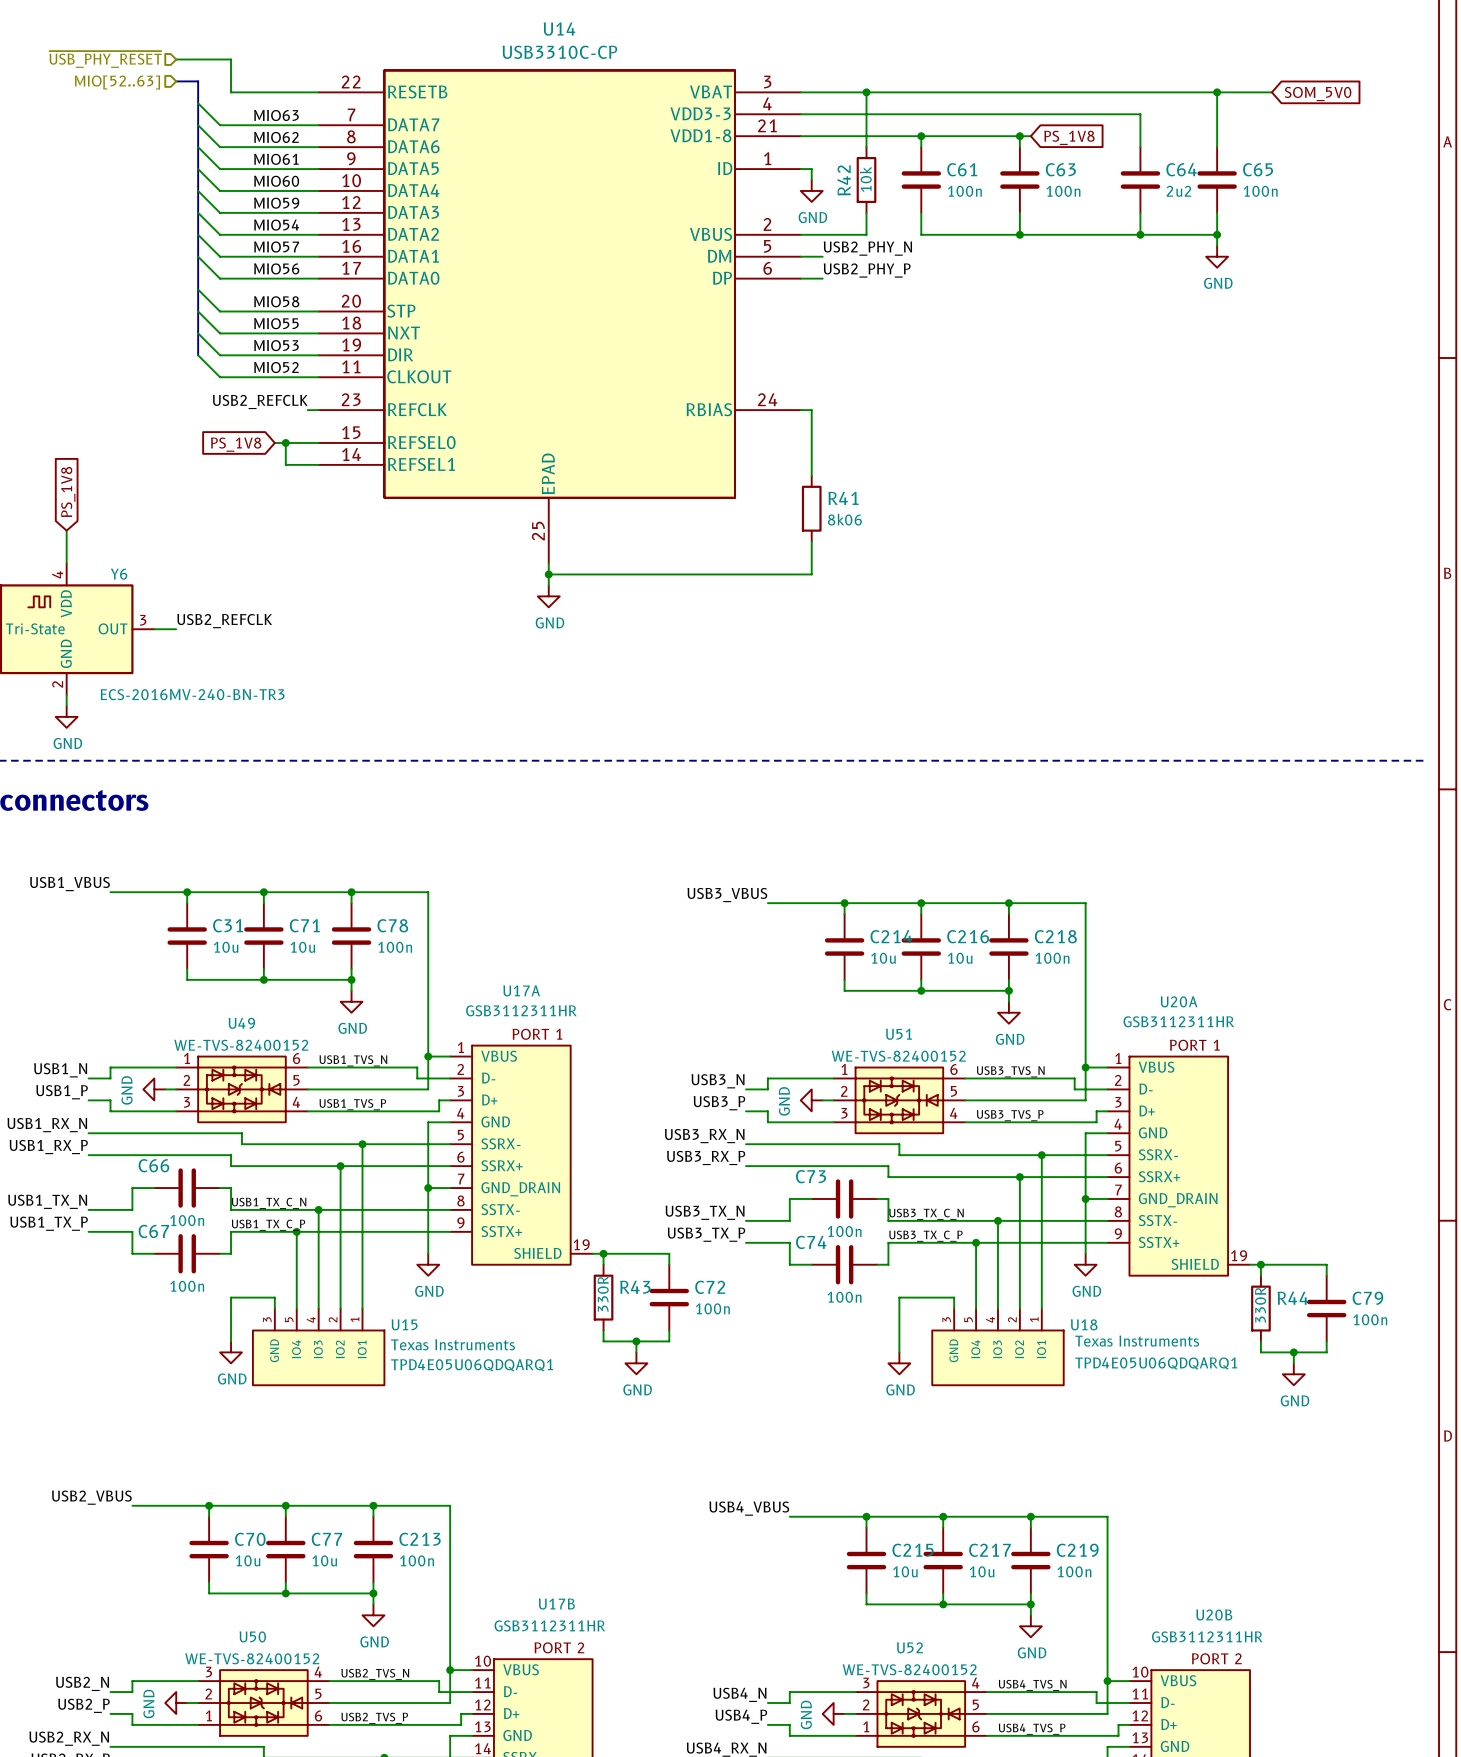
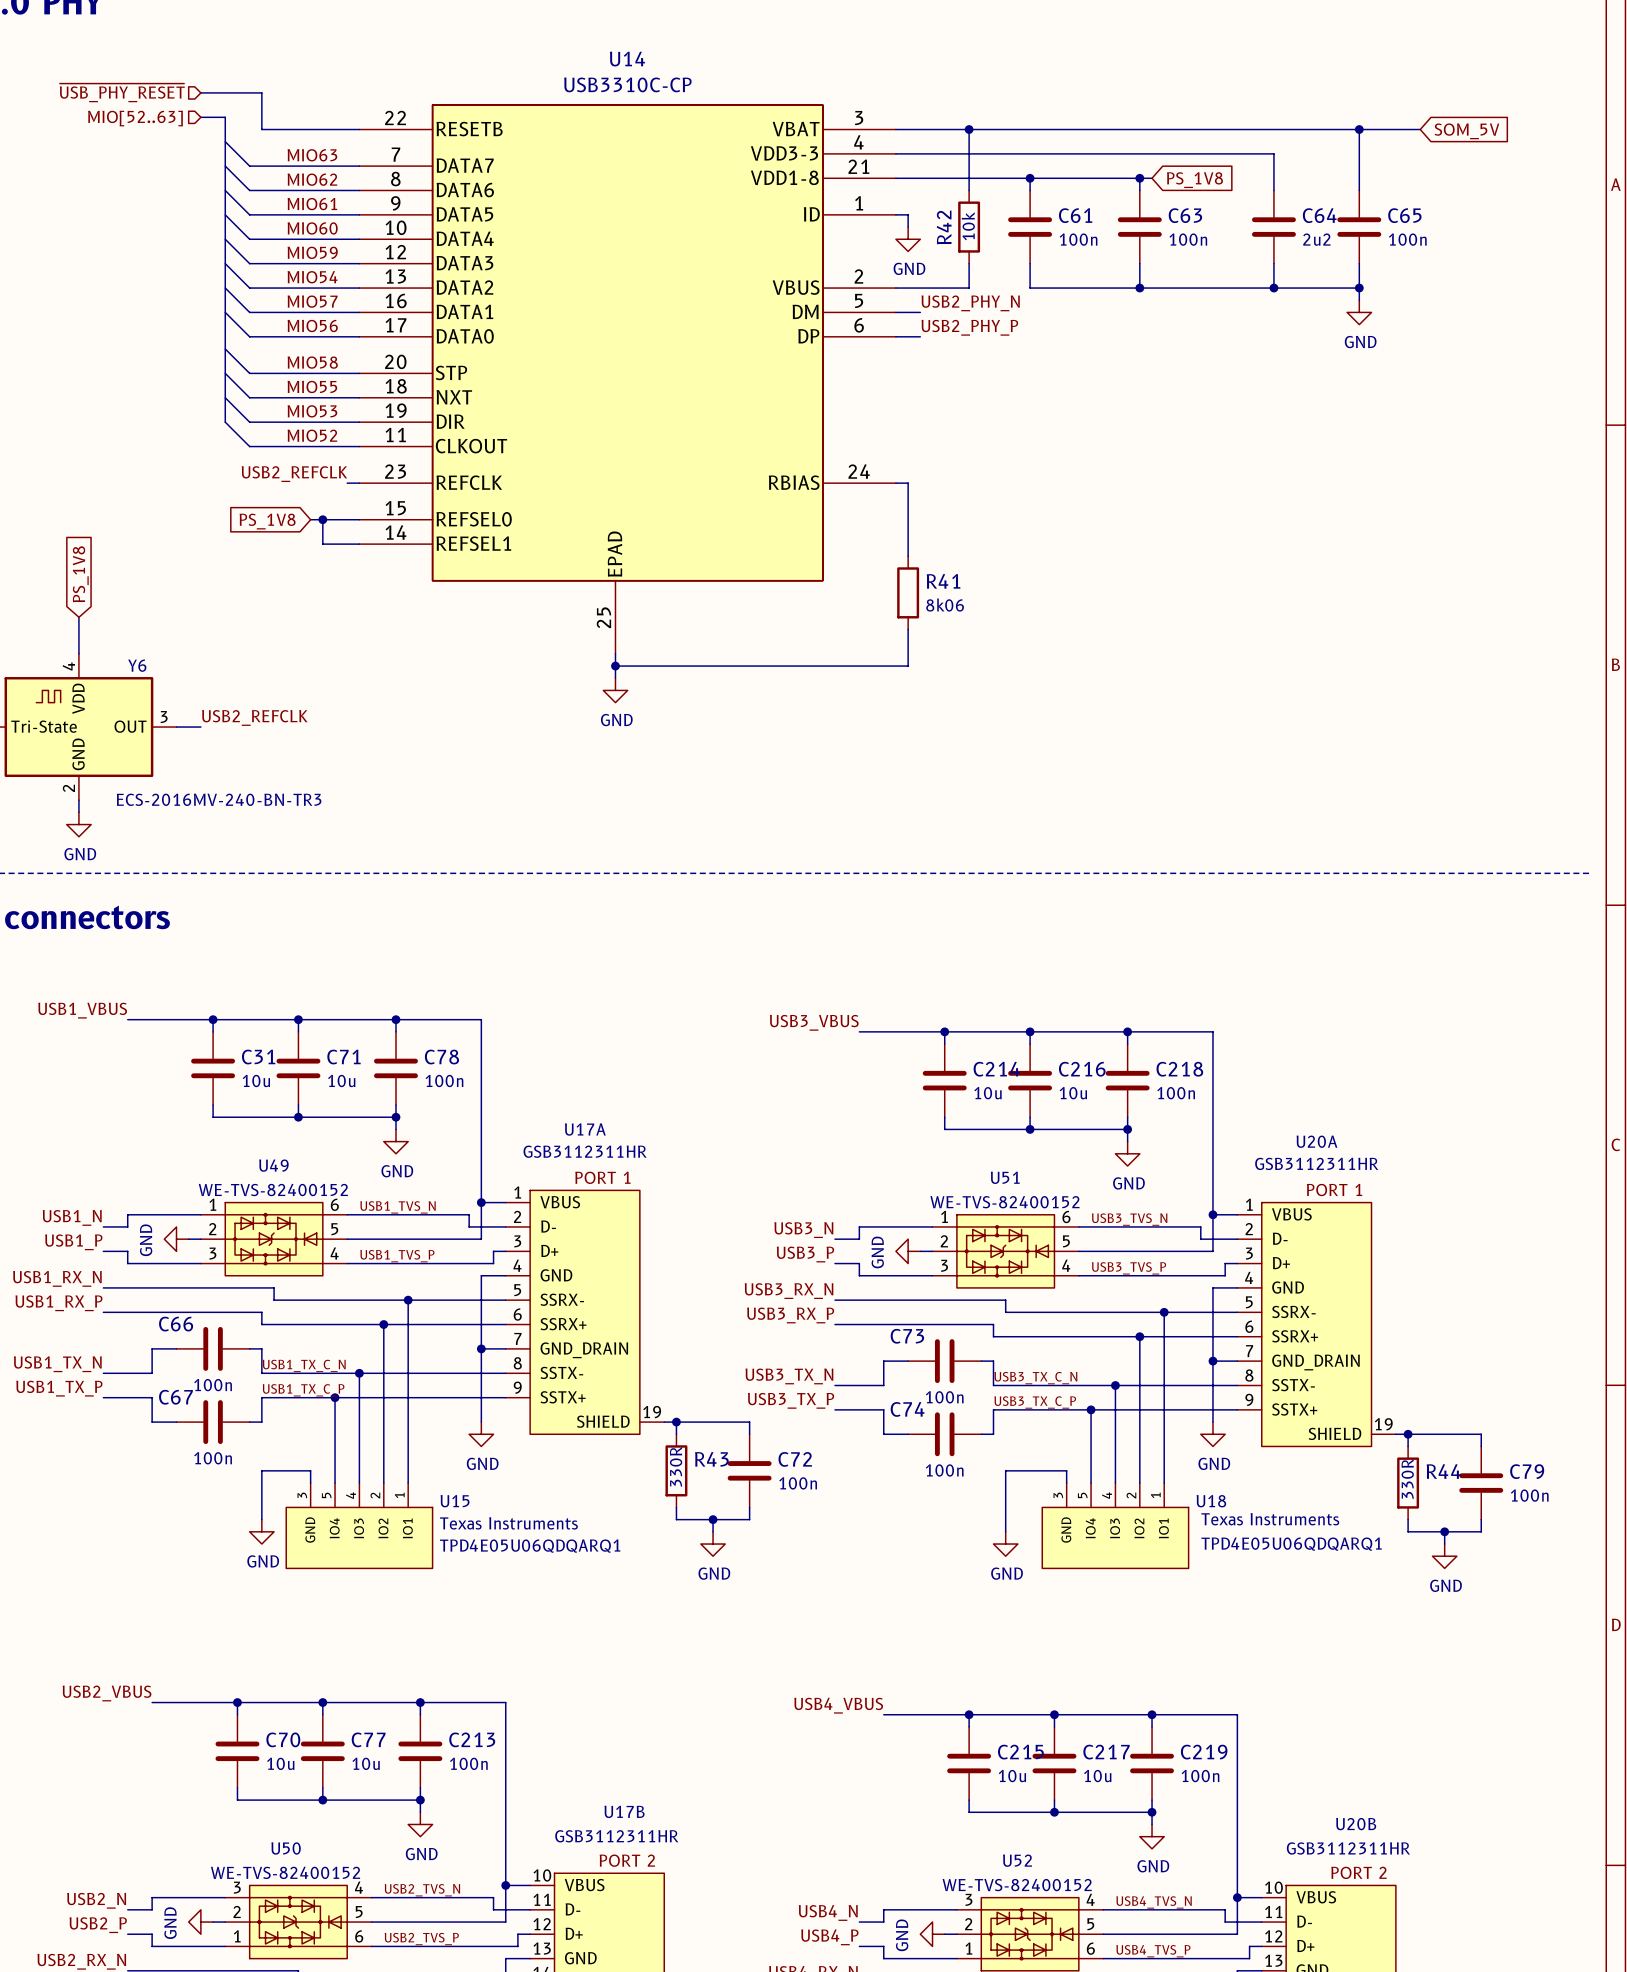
global label: SOM_5V0 (1318, 94) -> SOM_5V (1466, 131)

